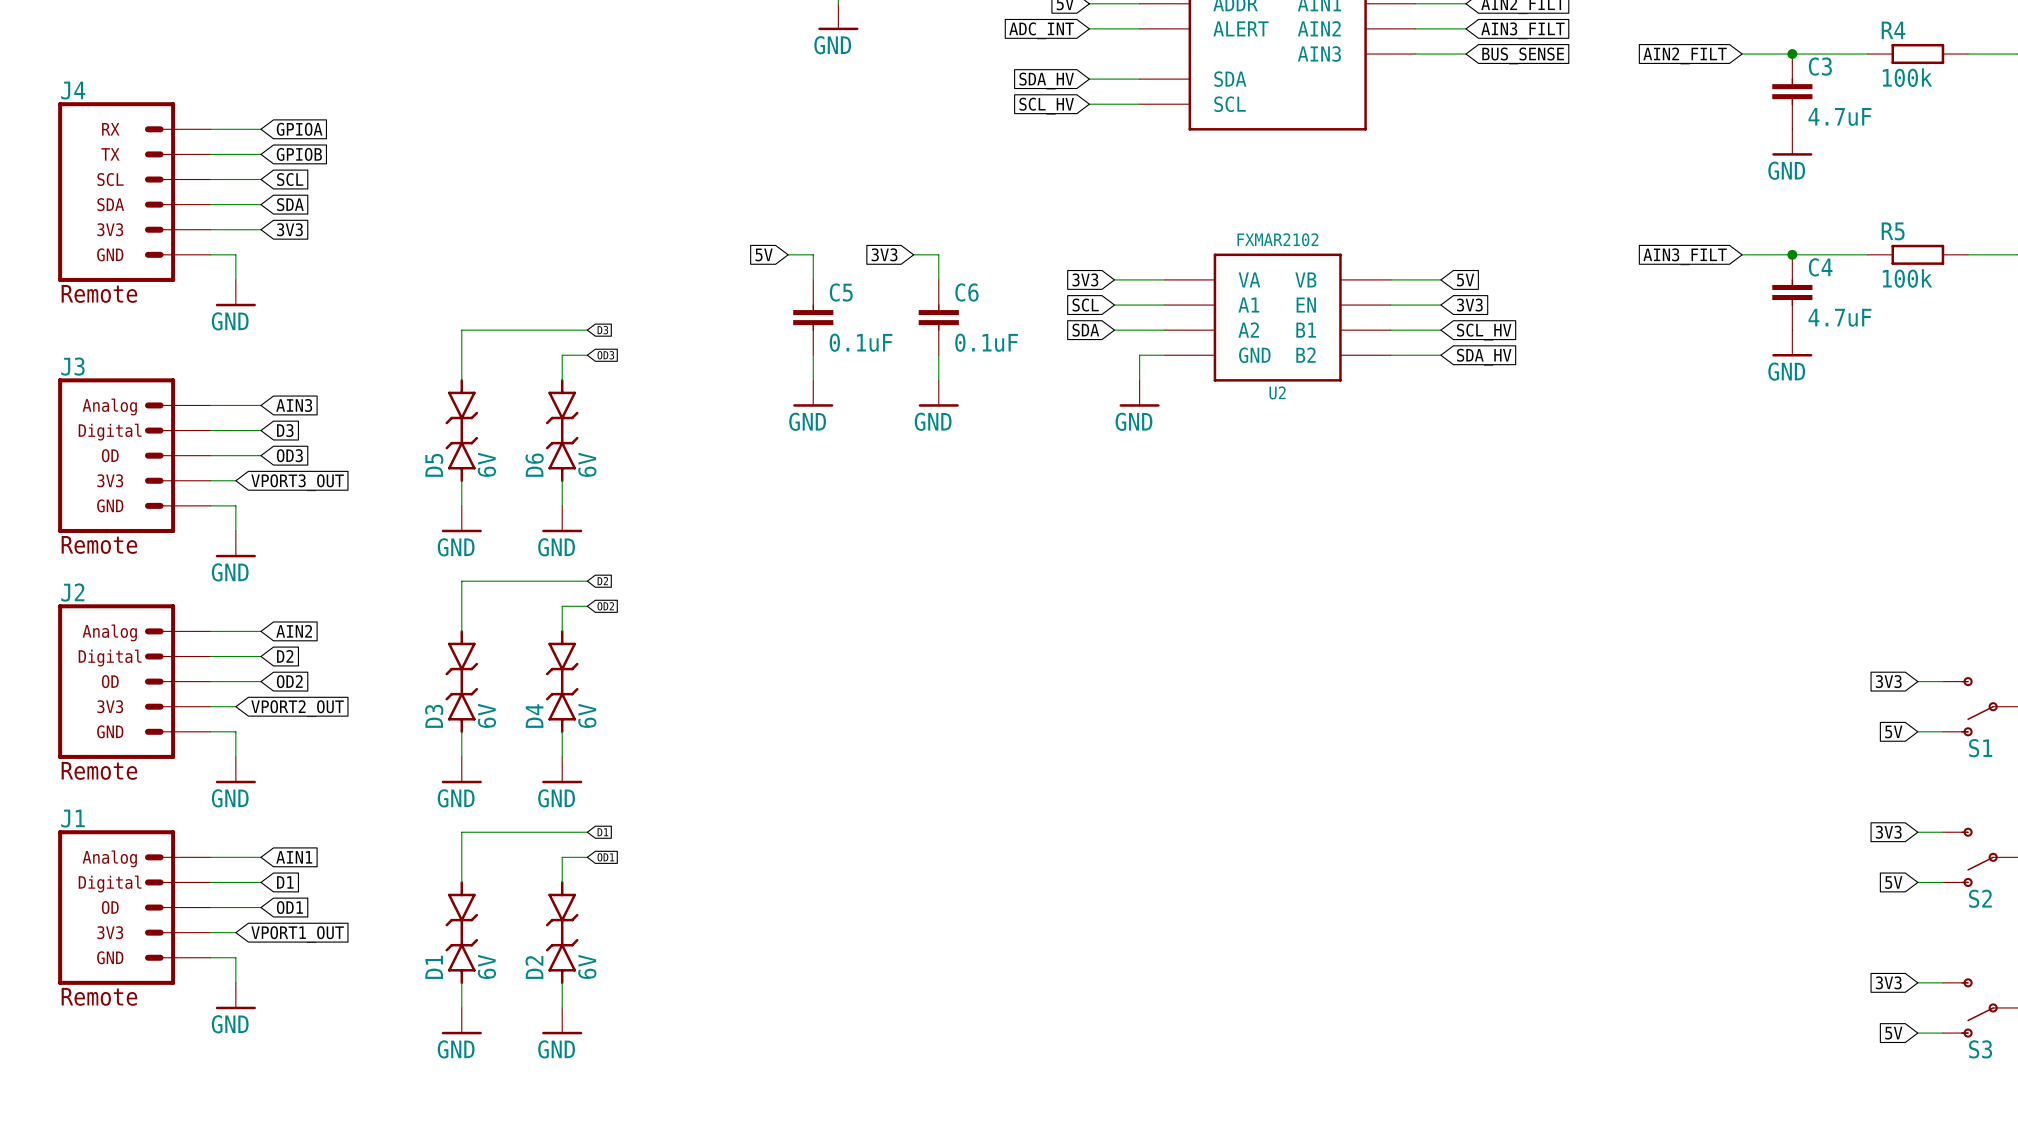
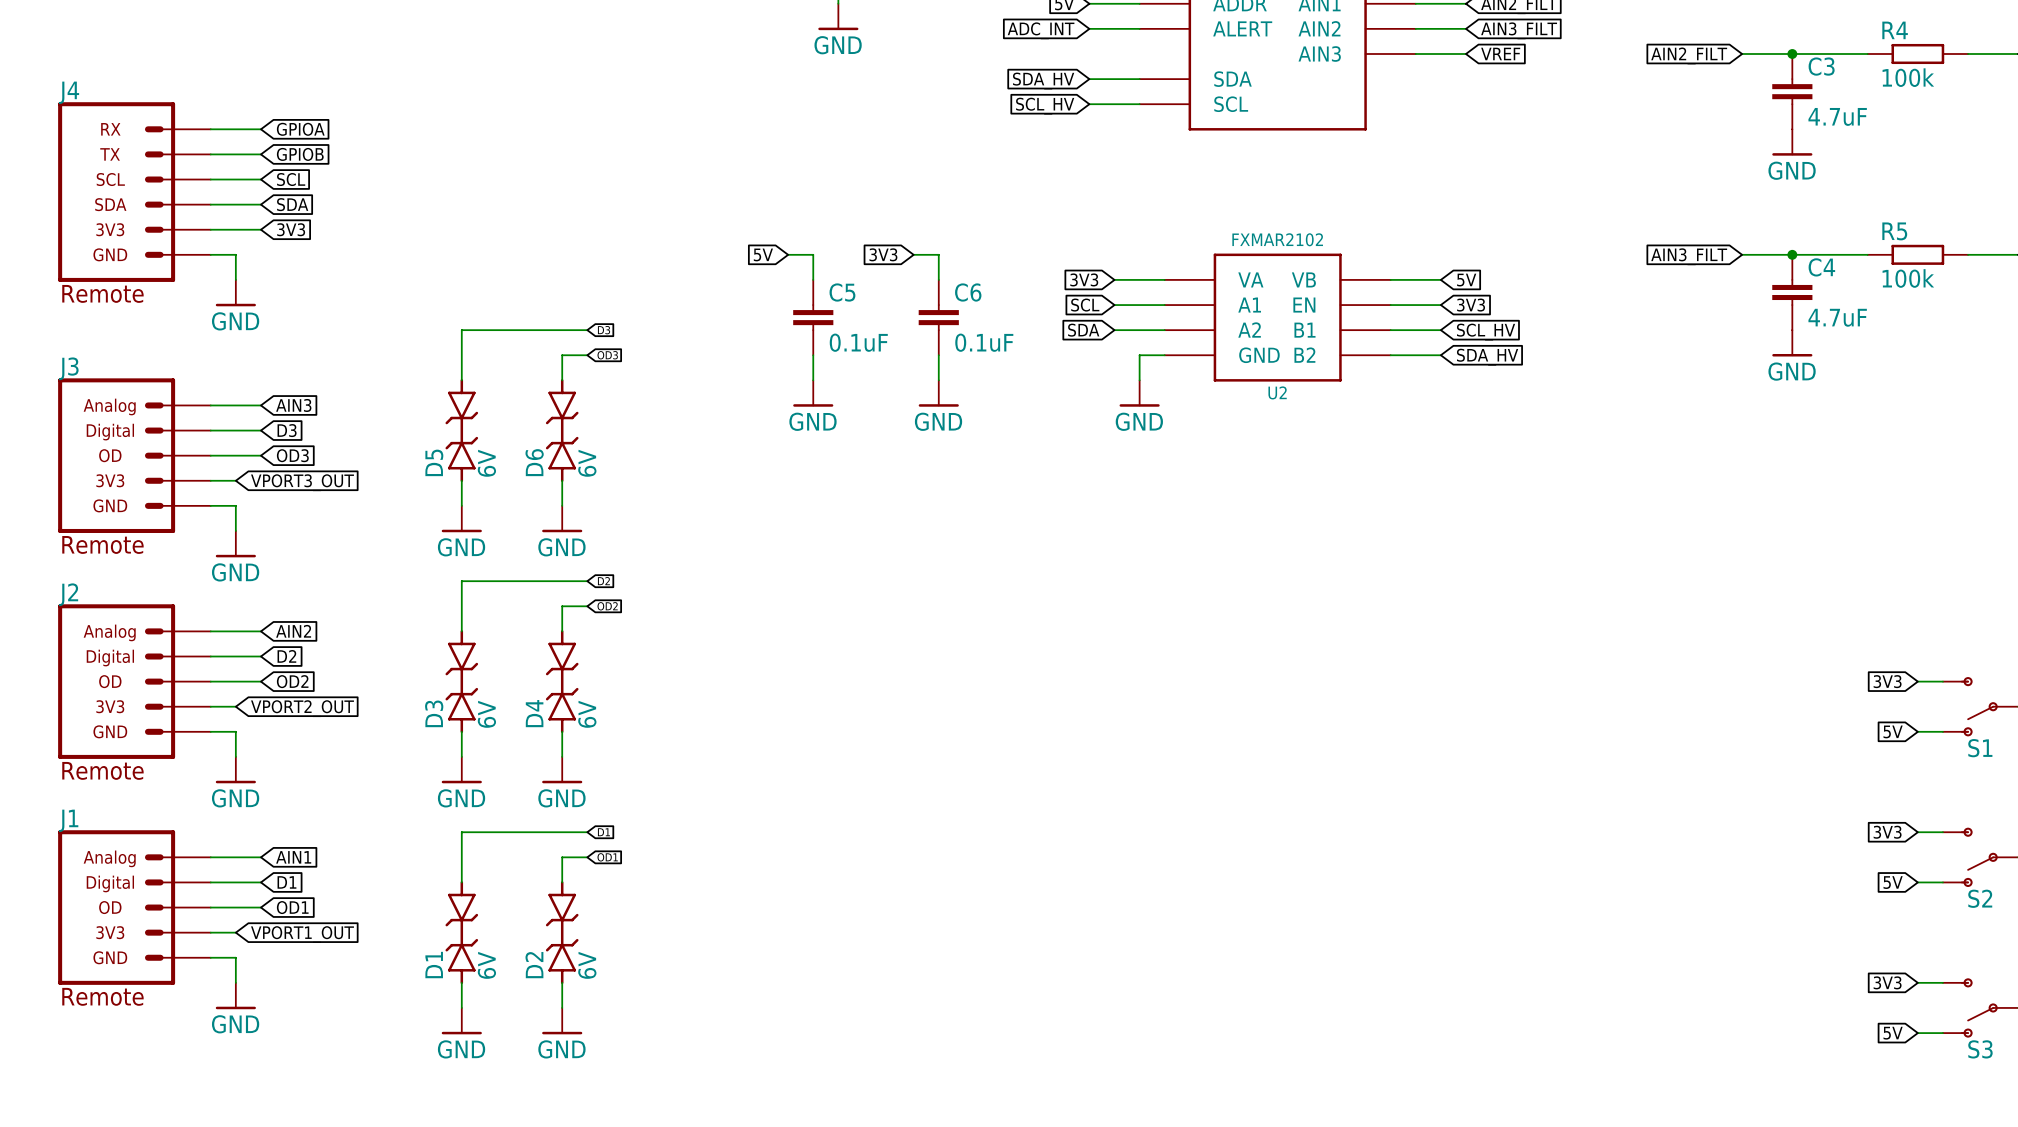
global label: BUS_SENSE (1523, 55) -> VREF (1500, 53)

